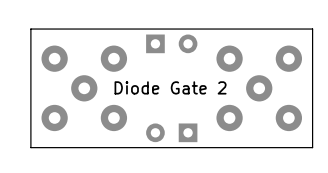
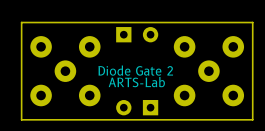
text: none -> ARTS-Lab (136, 82)

